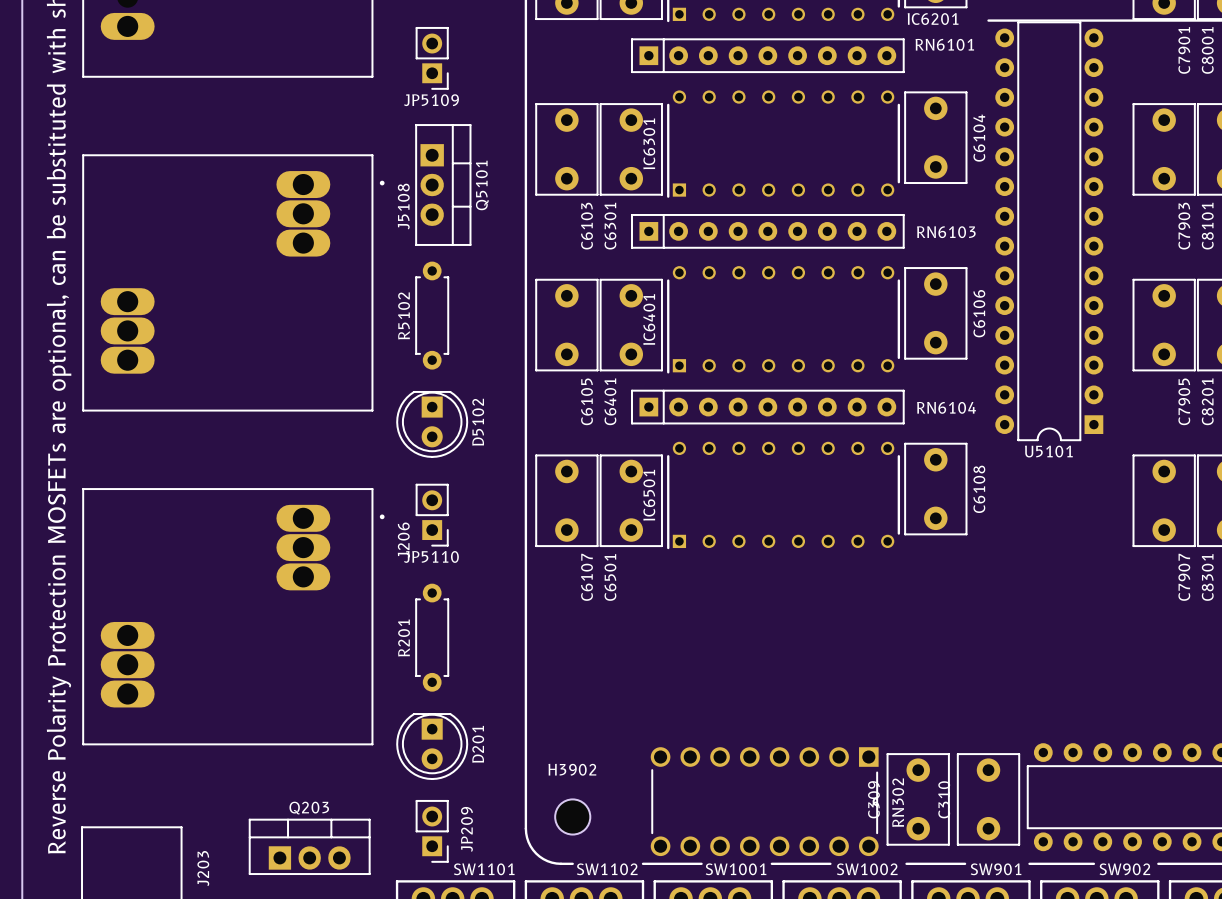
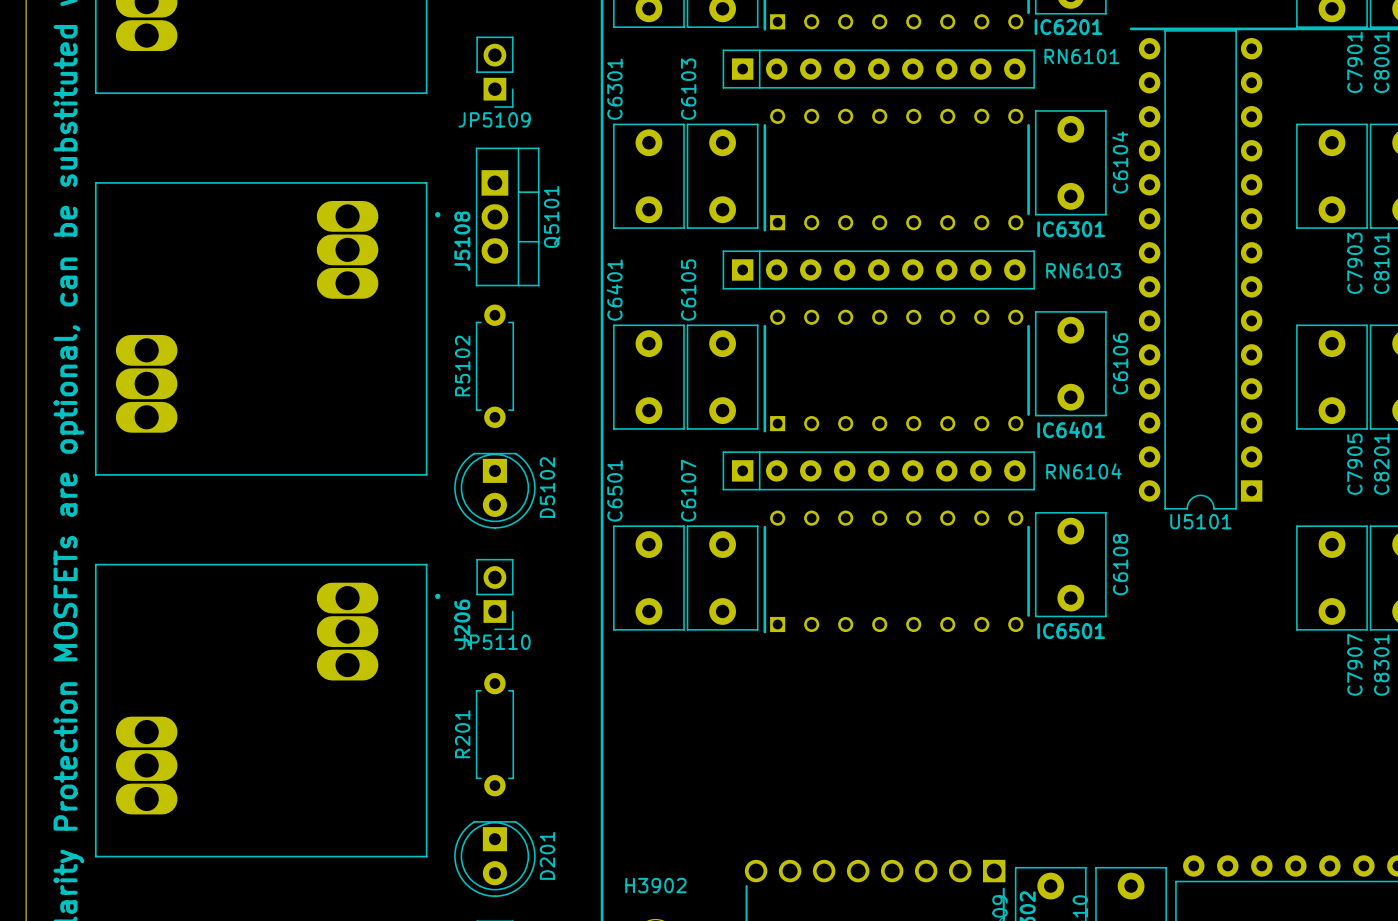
IC6301 name rotation: 0° (649, 143) -> 90° clockwise (1071, 229)
IC6301 name position: IC6301 (649, 143) -> IC6301 (1071, 229)
C6103 name position: C6103 (587, 226) -> C6103 (688, 89)
C6301 name position: C6301 (610, 226) -> C6301 (614, 89)
IC6401 name rotation: 0° (649, 319) -> 90° clockwise (1071, 429)
IC6401 name position: IC6401 (649, 319) -> IC6401 (1071, 429)
C6105 name position: C6105 (587, 401) -> C6105 (688, 290)
C6401 name position: C6401 (610, 401) -> C6401 (614, 290)
IC6501 name rotation: 0° (649, 495) -> 90° clockwise (1071, 631)
IC6501 name position: IC6501 (649, 495) -> IC6501 (1071, 631)
C6107 name position: C6107 (587, 577) -> C6107 (688, 490)
C6501 name position: C6501 (610, 577) -> C6501 (614, 490)

